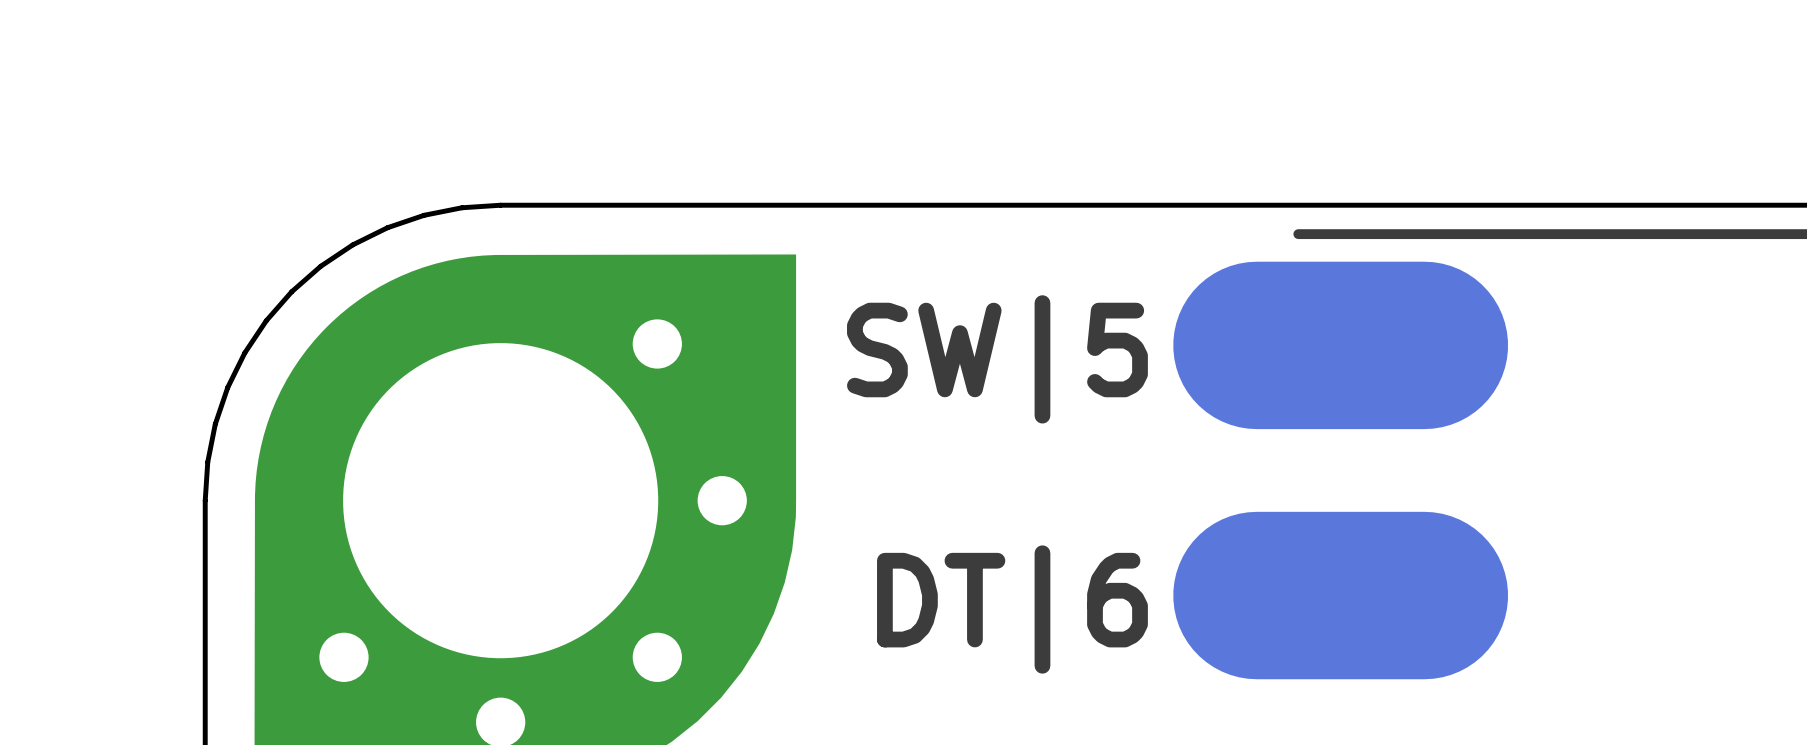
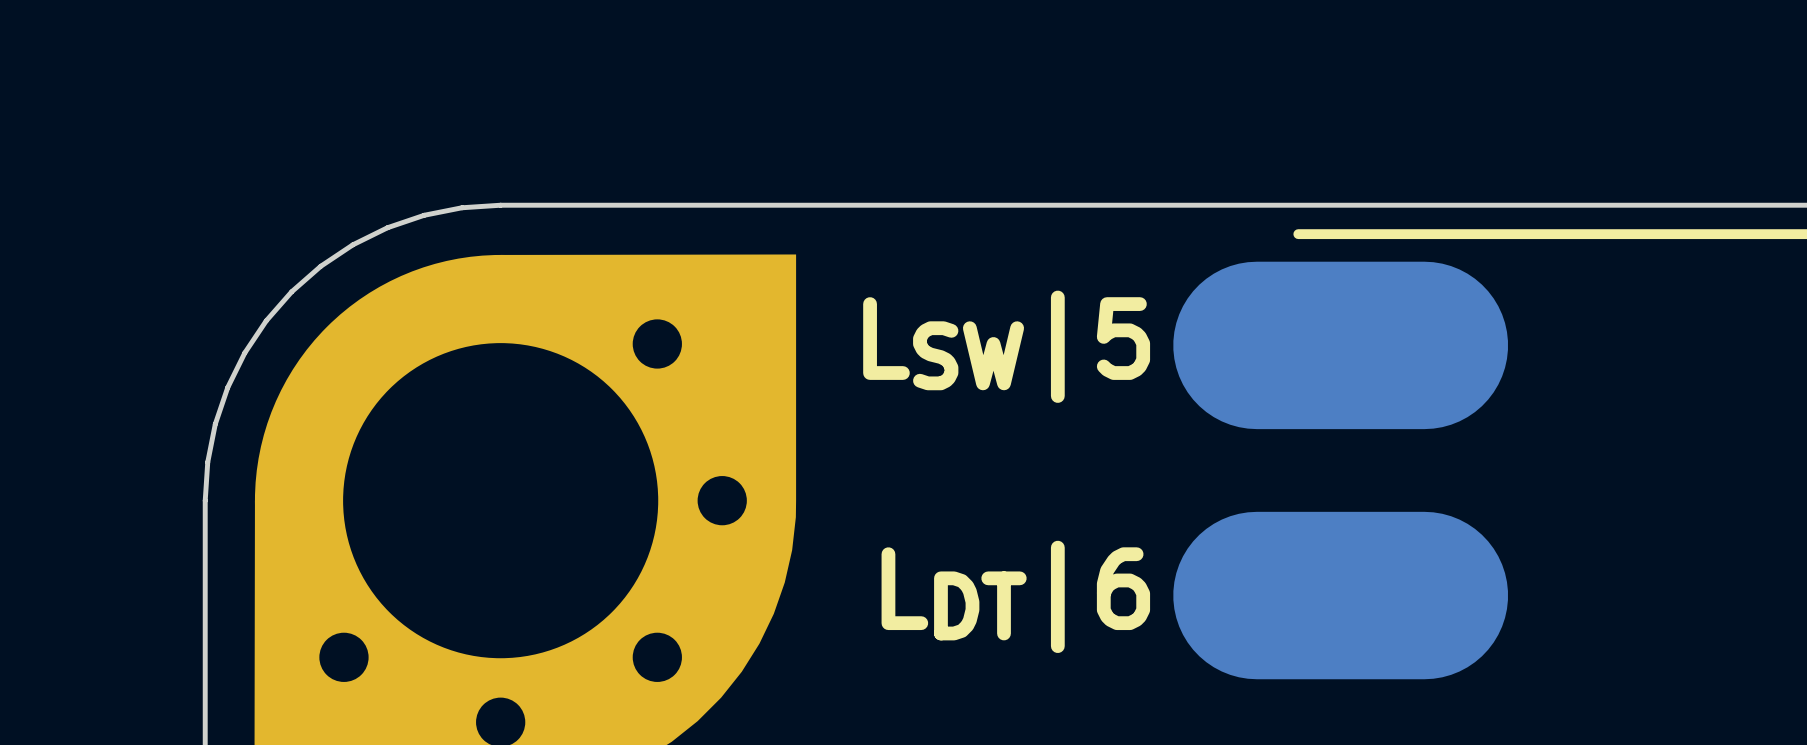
text: SW|5 (997, 359) -> LSW|5 (1006, 346)
text: DT|6 (1012, 609) -> LDT|6 (1015, 596)

